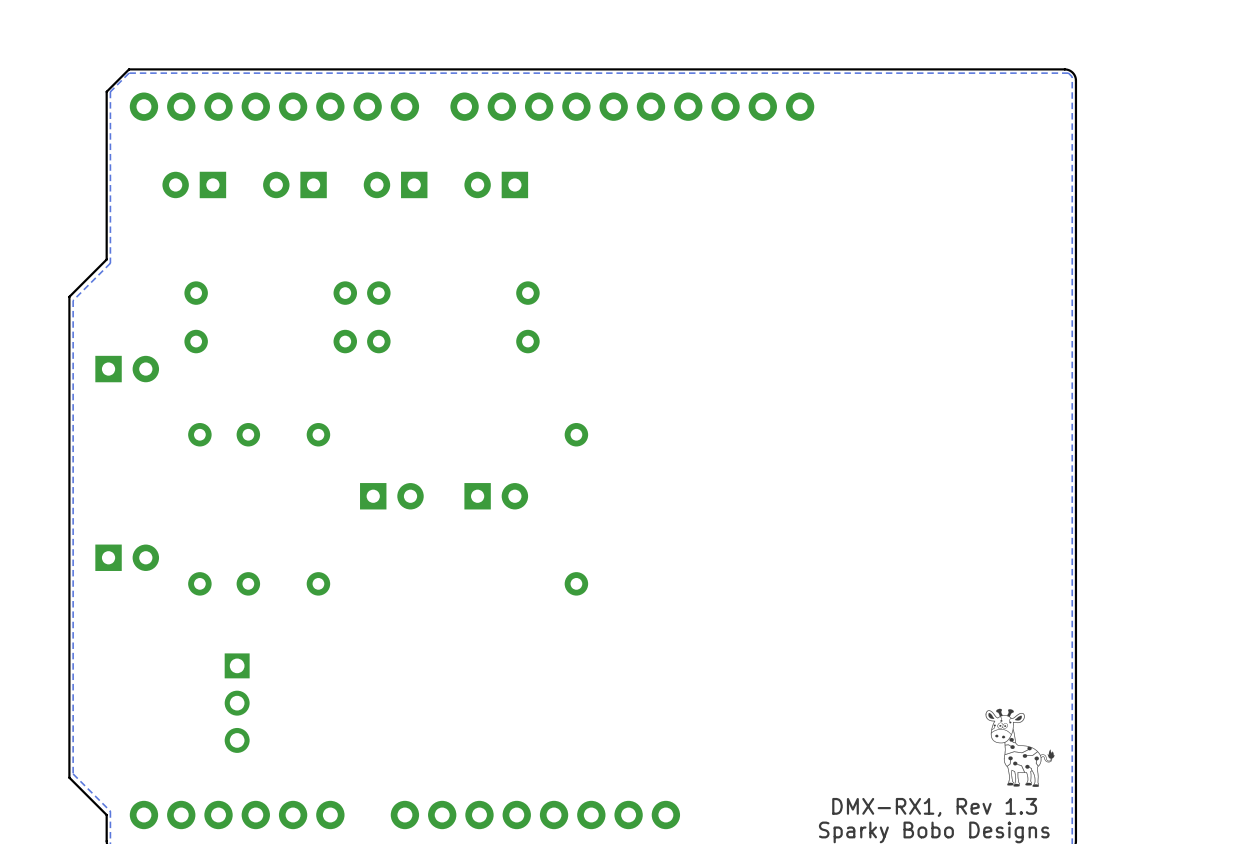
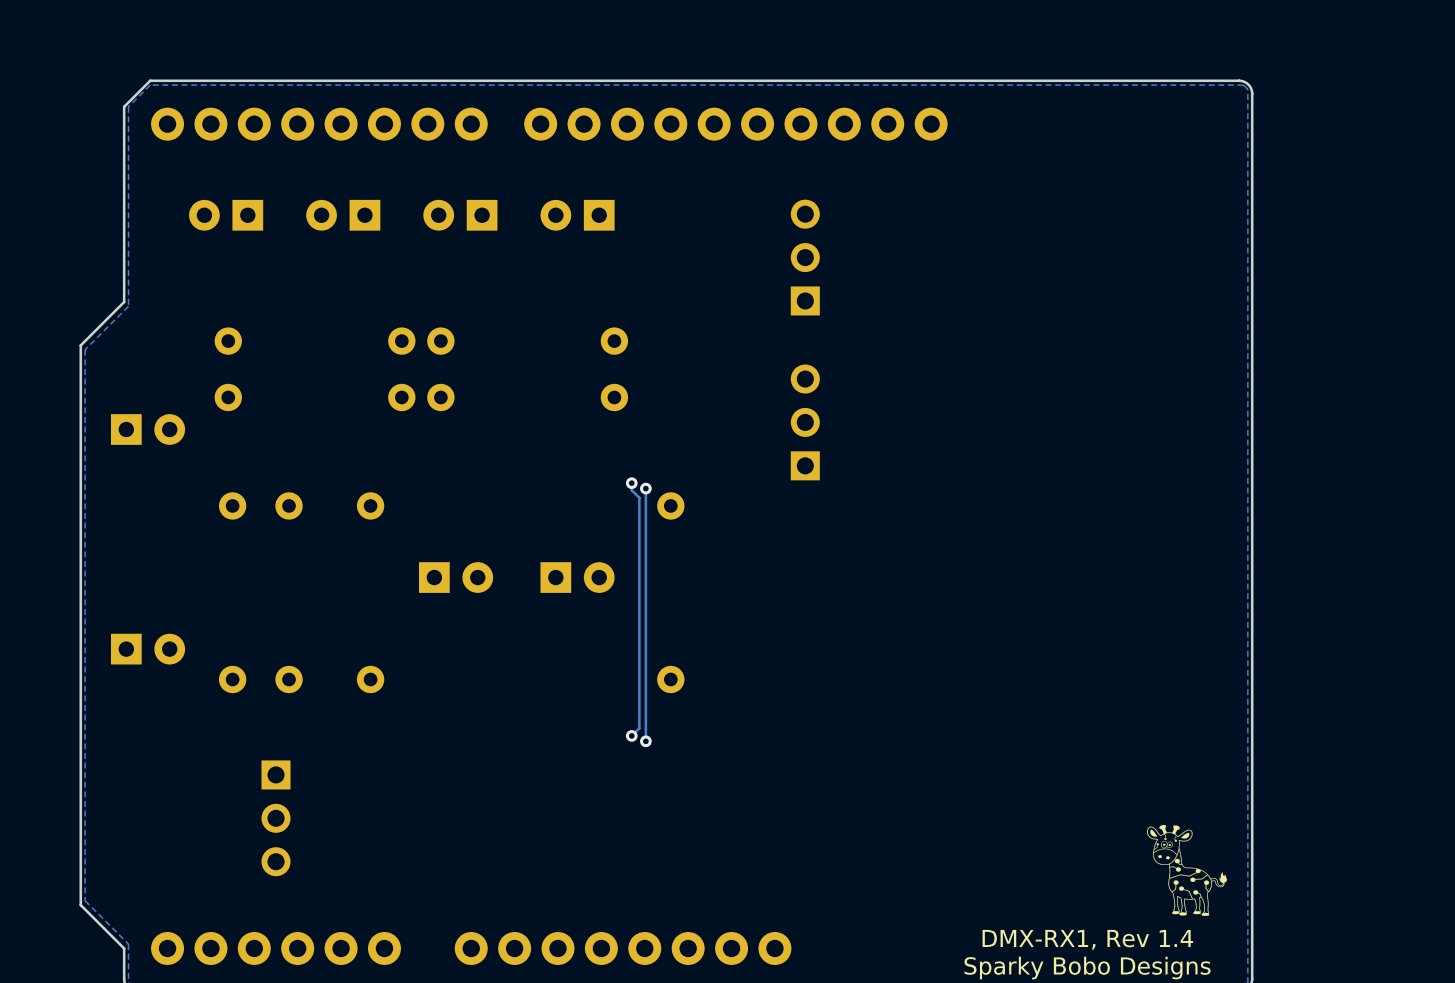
part: none -> (805, 257)
part: none -> (805, 422)
track: none -> (631, 483) (631, 490) (639, 497) (639, 728) (631, 735)
via: none -> (631, 483)
track: none -> (645, 488) (645, 741)
via: none -> (645, 488)
via: none -> (631, 735)
via: none -> (645, 741)
text: DMX-RX1, Rev 1.3 (934, 807) -> DMX-RX1, Rev 1.4 (1087, 939)

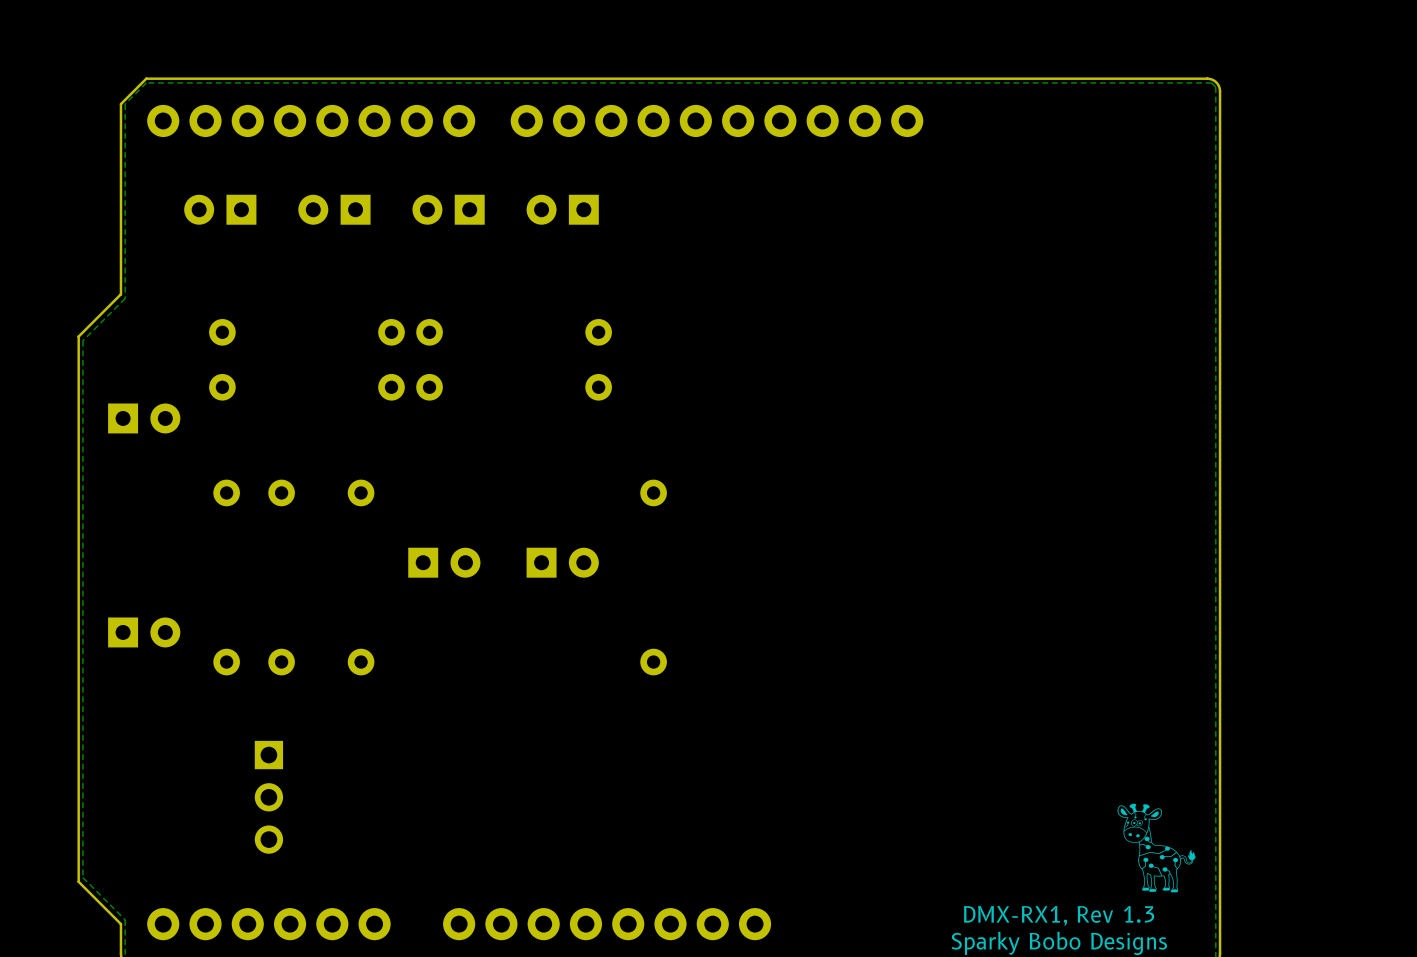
part: (805, 257) -> none
part: (805, 422) -> none
track: (631, 483) (631, 490) (639, 497) (639, 728) (631, 735) -> none
via: (631, 483) -> none
track: (645, 488) (645, 741) -> none
via: (645, 488) -> none
via: (631, 735) -> none
via: (645, 741) -> none
text: DMX-RX1, Rev 1.4 (1087, 939) -> DMX-RX1, Rev 1.3 (1059, 915)

